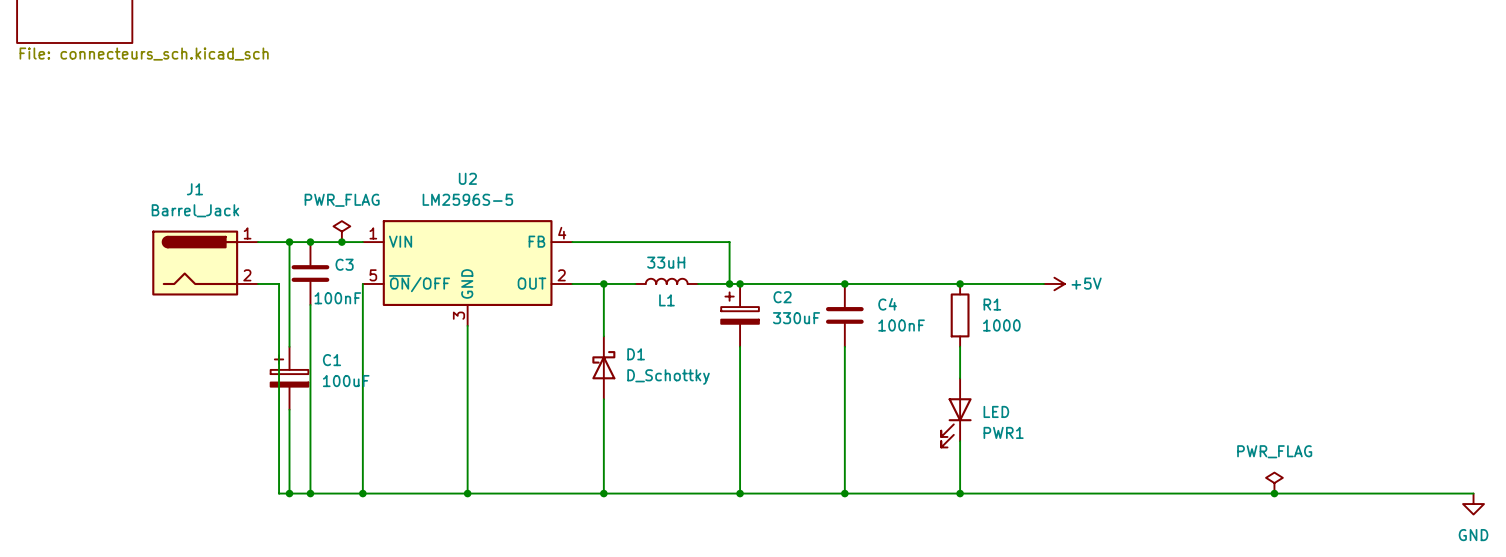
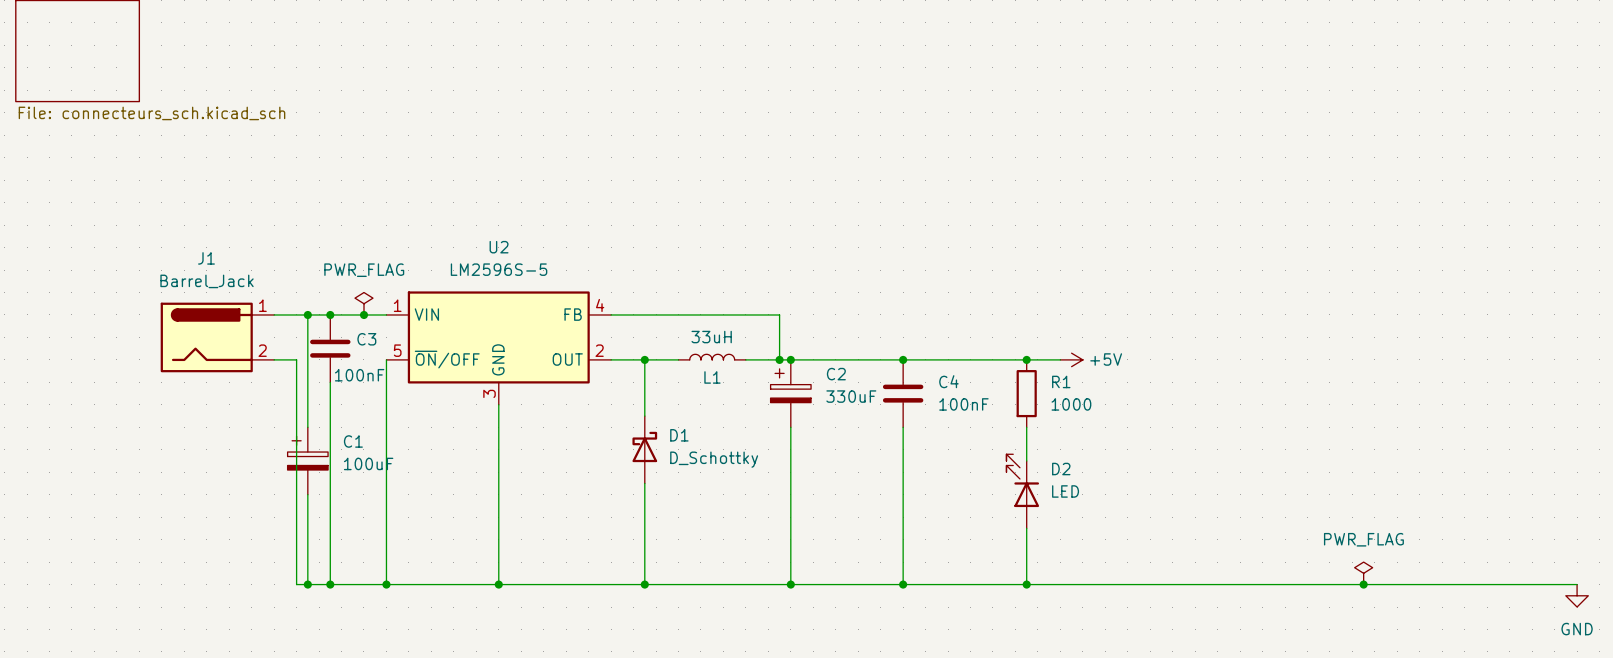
power symbol position: +5V (1054, 283) -> +5V (1071, 359)
D2: none -> LED (1022, 491)
PWR1: LED (956, 412) -> none

